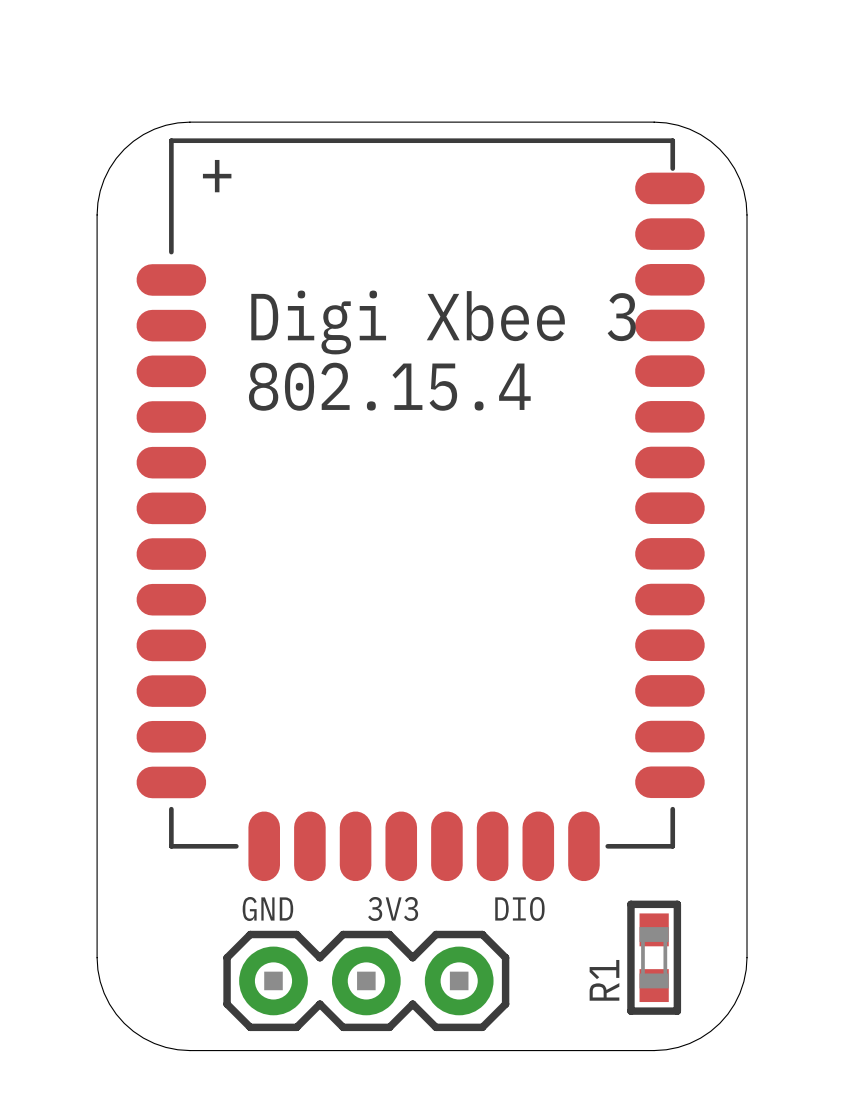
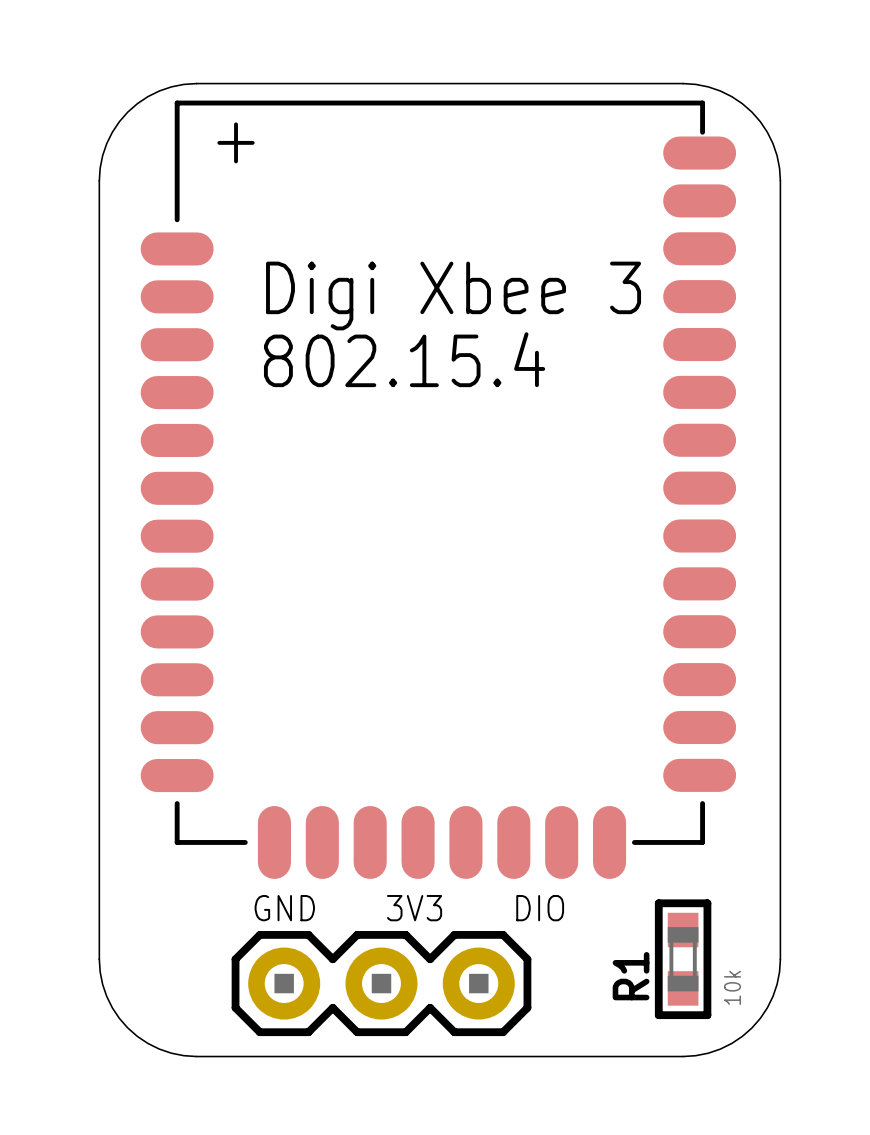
R1 value: none -> 10k (732, 987)

